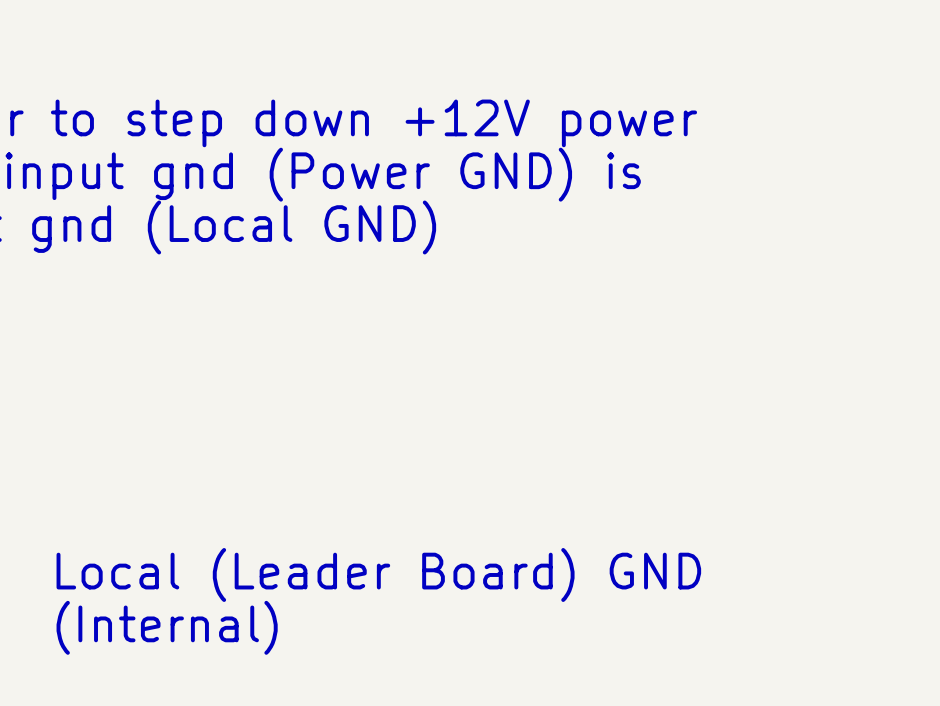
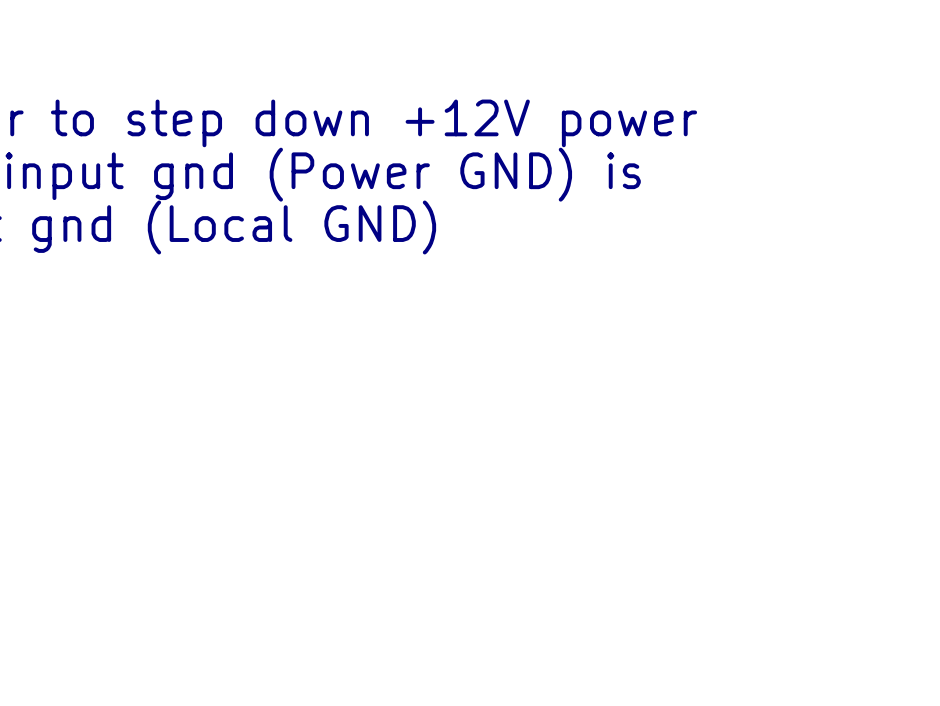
text: Local (Leader Board) GND (378, 574) -> none
text: (Internal) (167, 627) -> none

